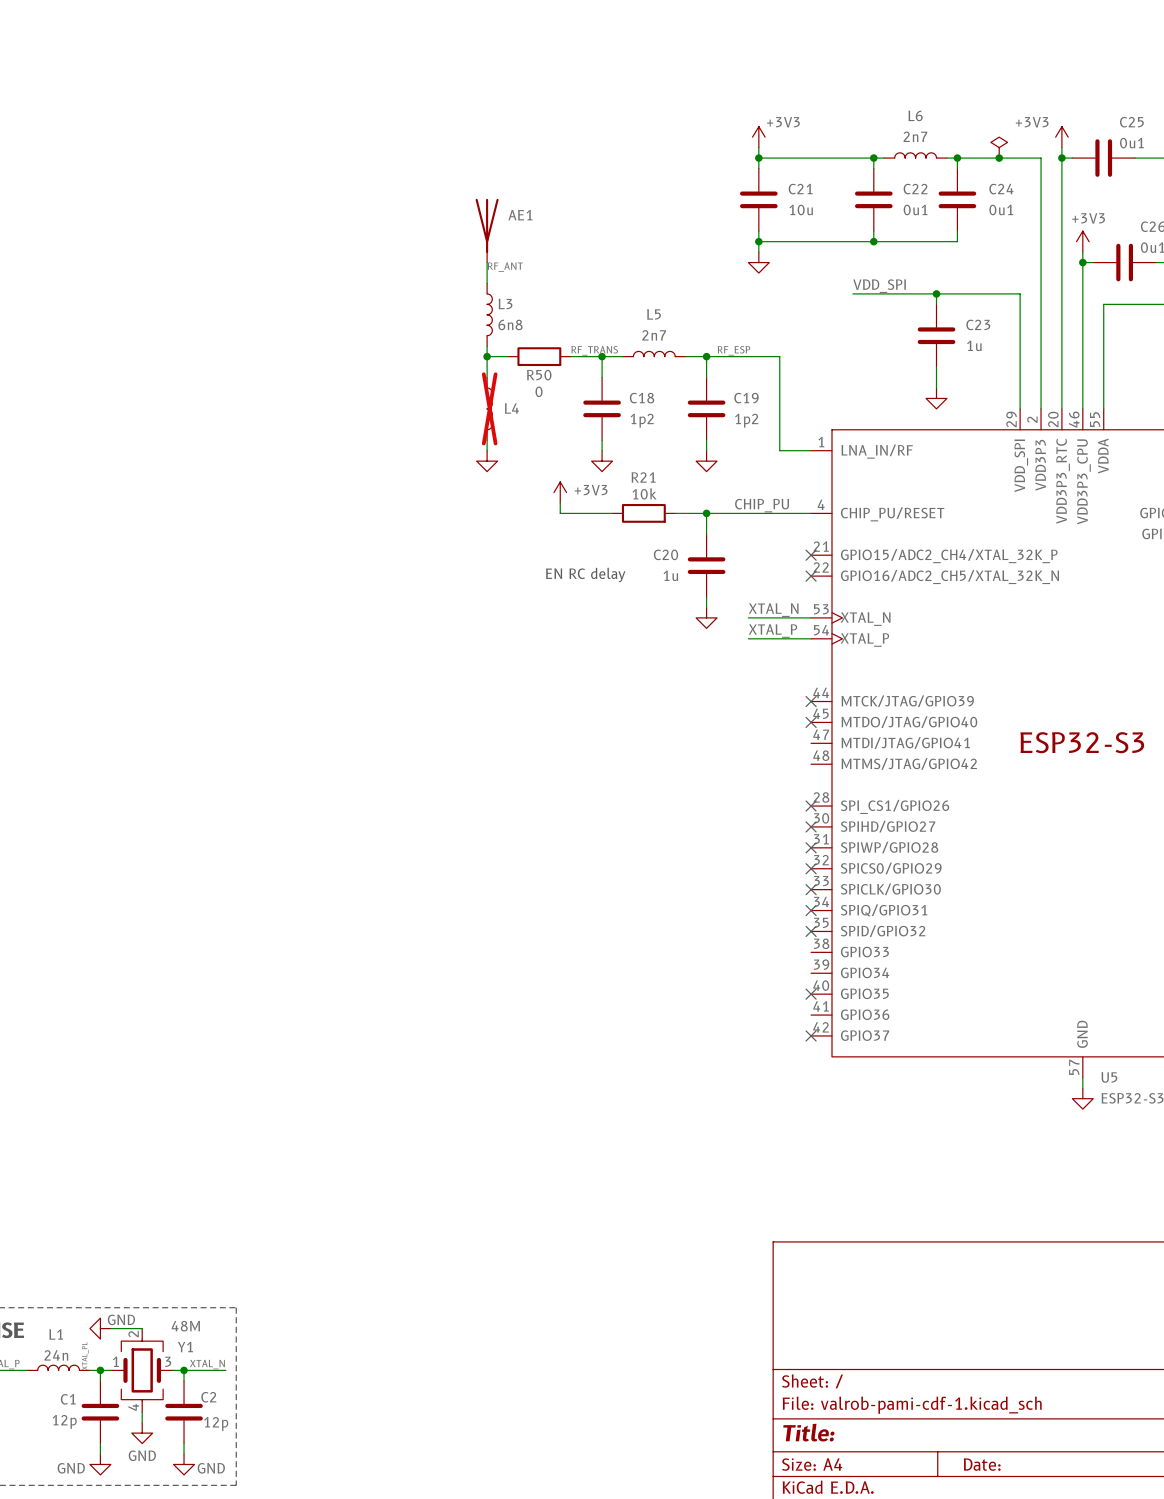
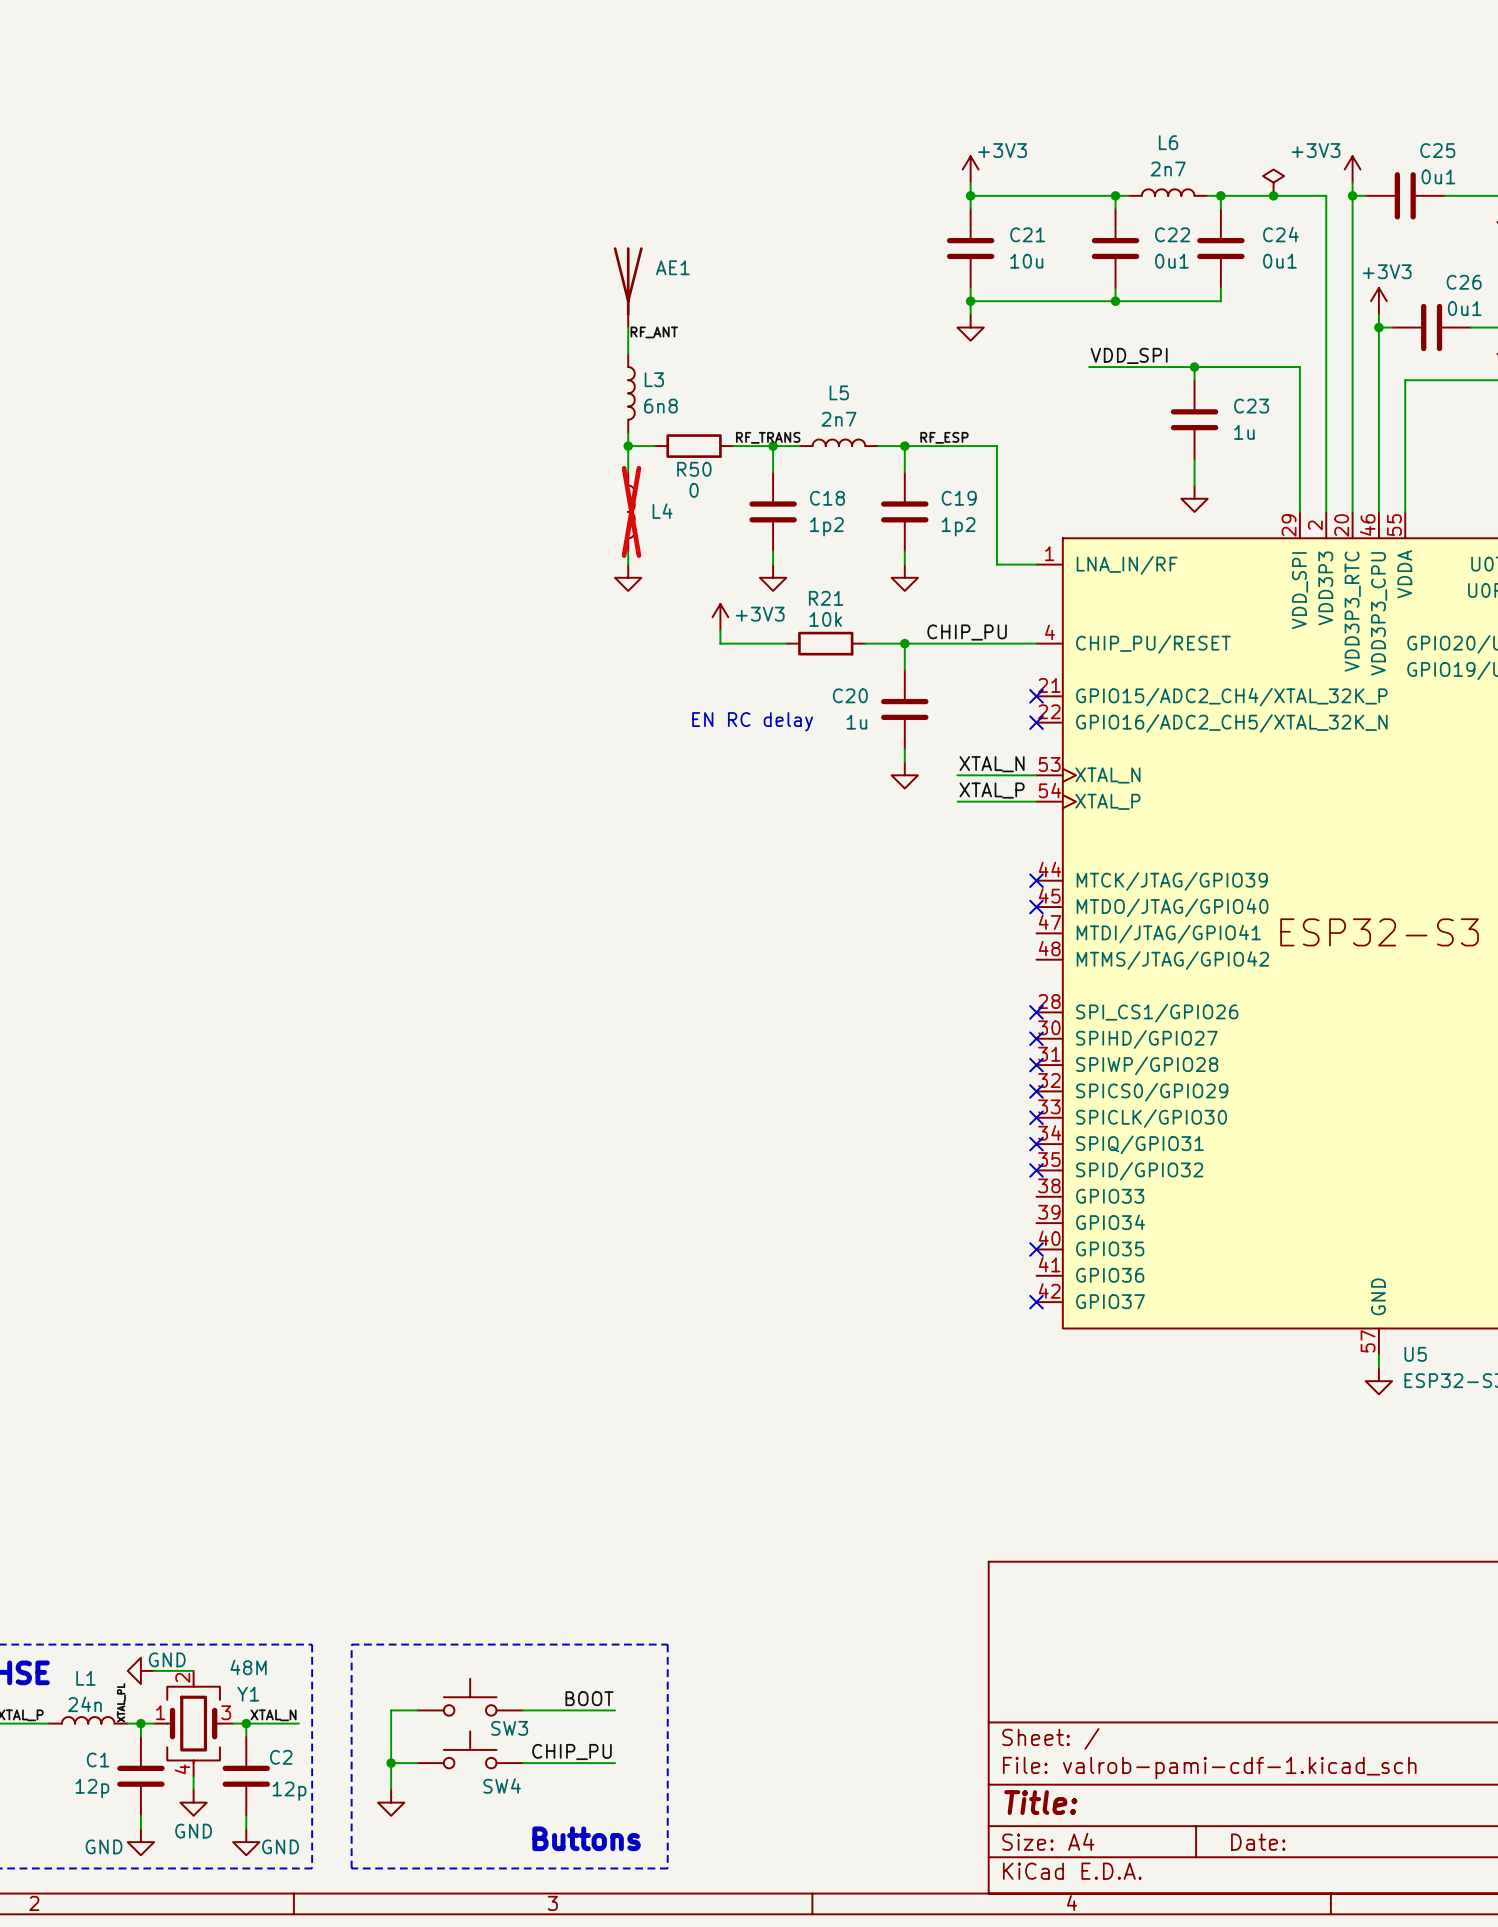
line: none -> (351, 1644) (667, 1644) (667, 1868) (351, 1868) (351, 1644)
SW3: none -> (470, 1697)
label: none -> BOOT (589, 1698)
wire: none -> (417, 1710) (391, 1710) (391, 1789)
wire: none -> (522, 1710) (615, 1710)
SW4: none -> (470, 1749)
label: none -> CHIP_PU (571, 1751)
wire: none -> (391, 1763) (417, 1763)
junction: none -> (391, 1763)
wire: none -> (522, 1763) (615, 1763)
power symbol: none -> (391, 1802)
text: none -> Buttons (586, 1838)

